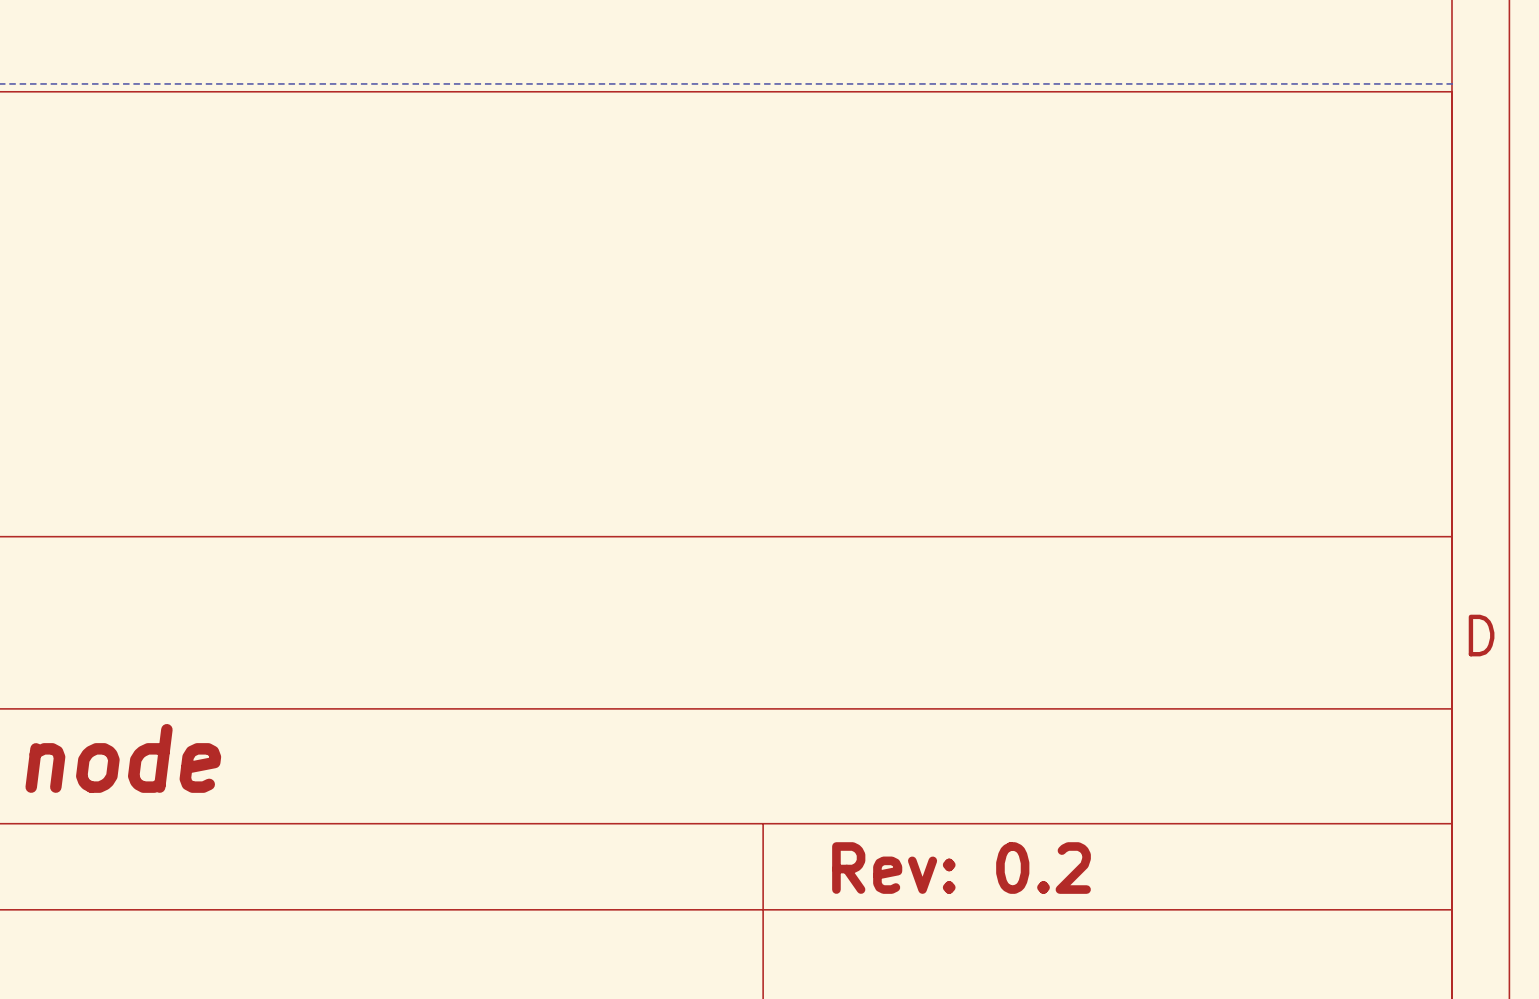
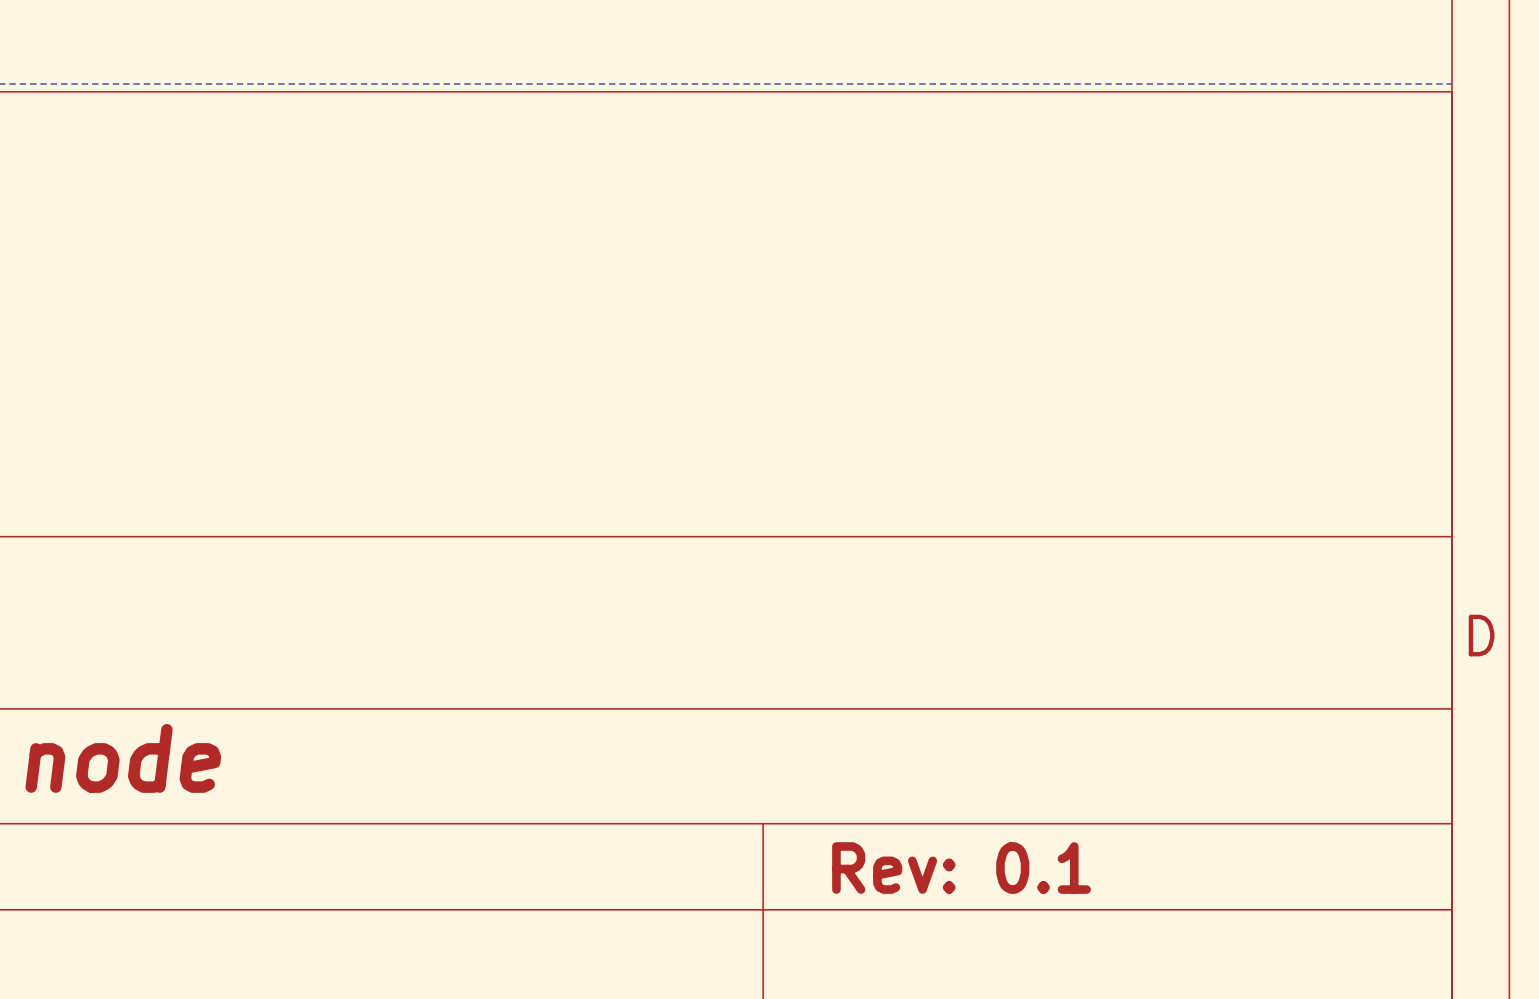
title block: Rev: 0.2 (961, 868) -> Rev: 0.1 (961, 868)

